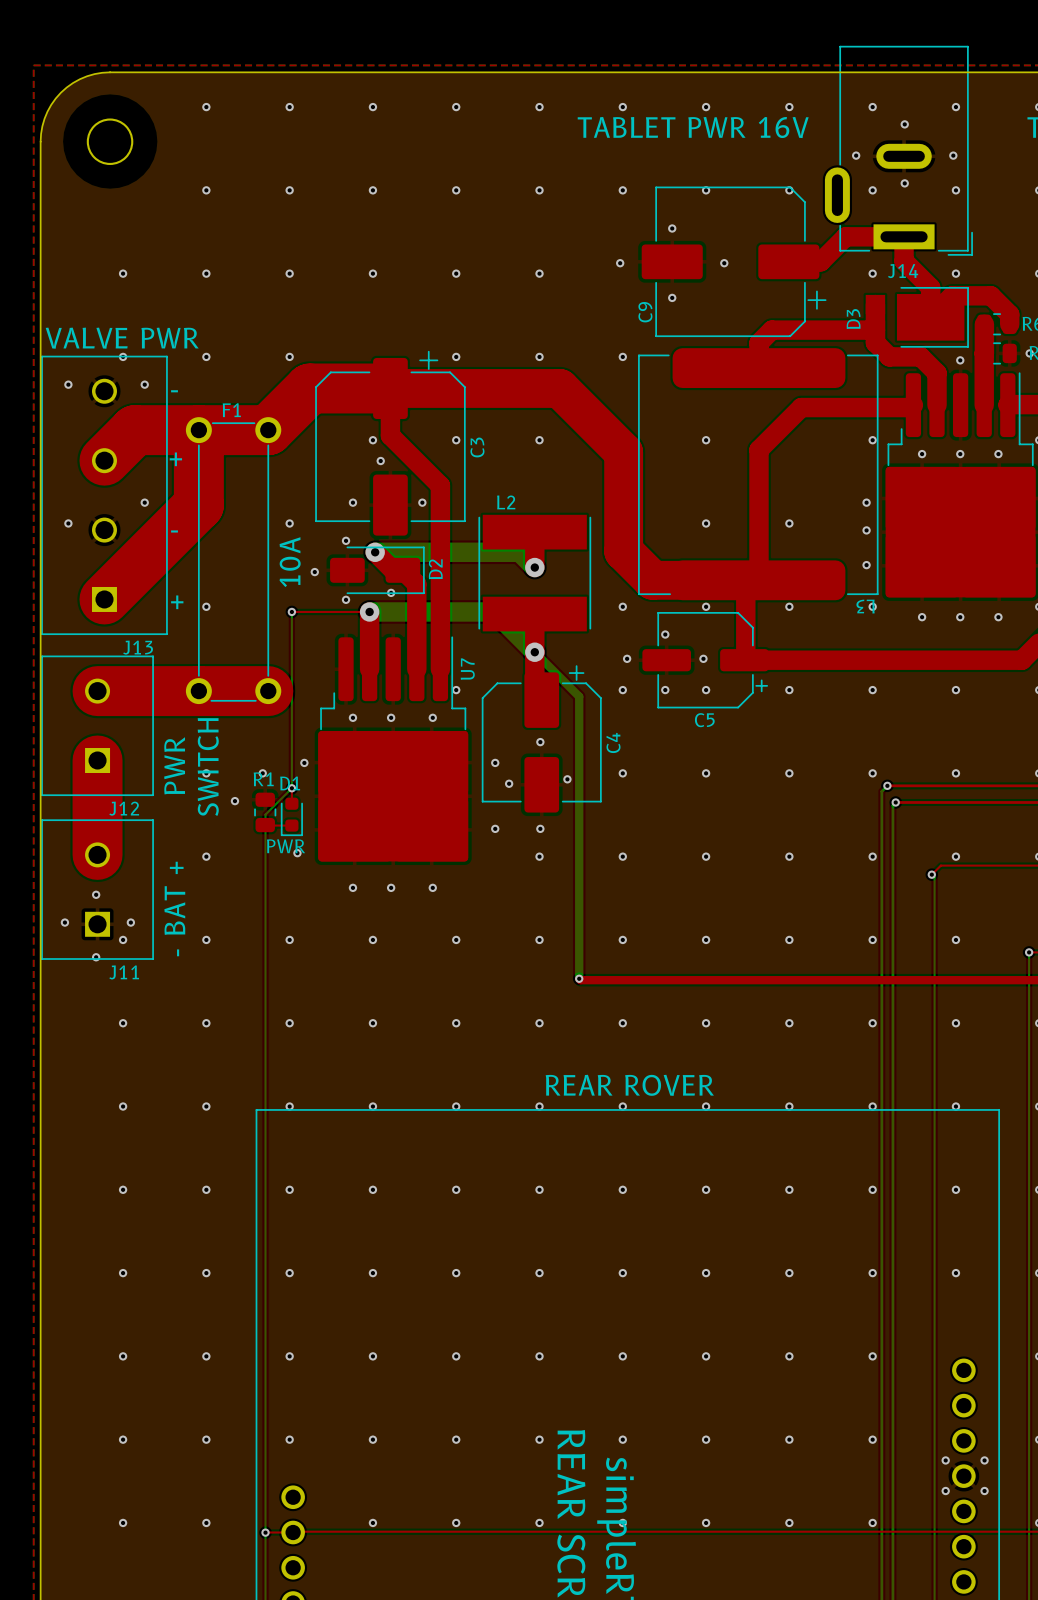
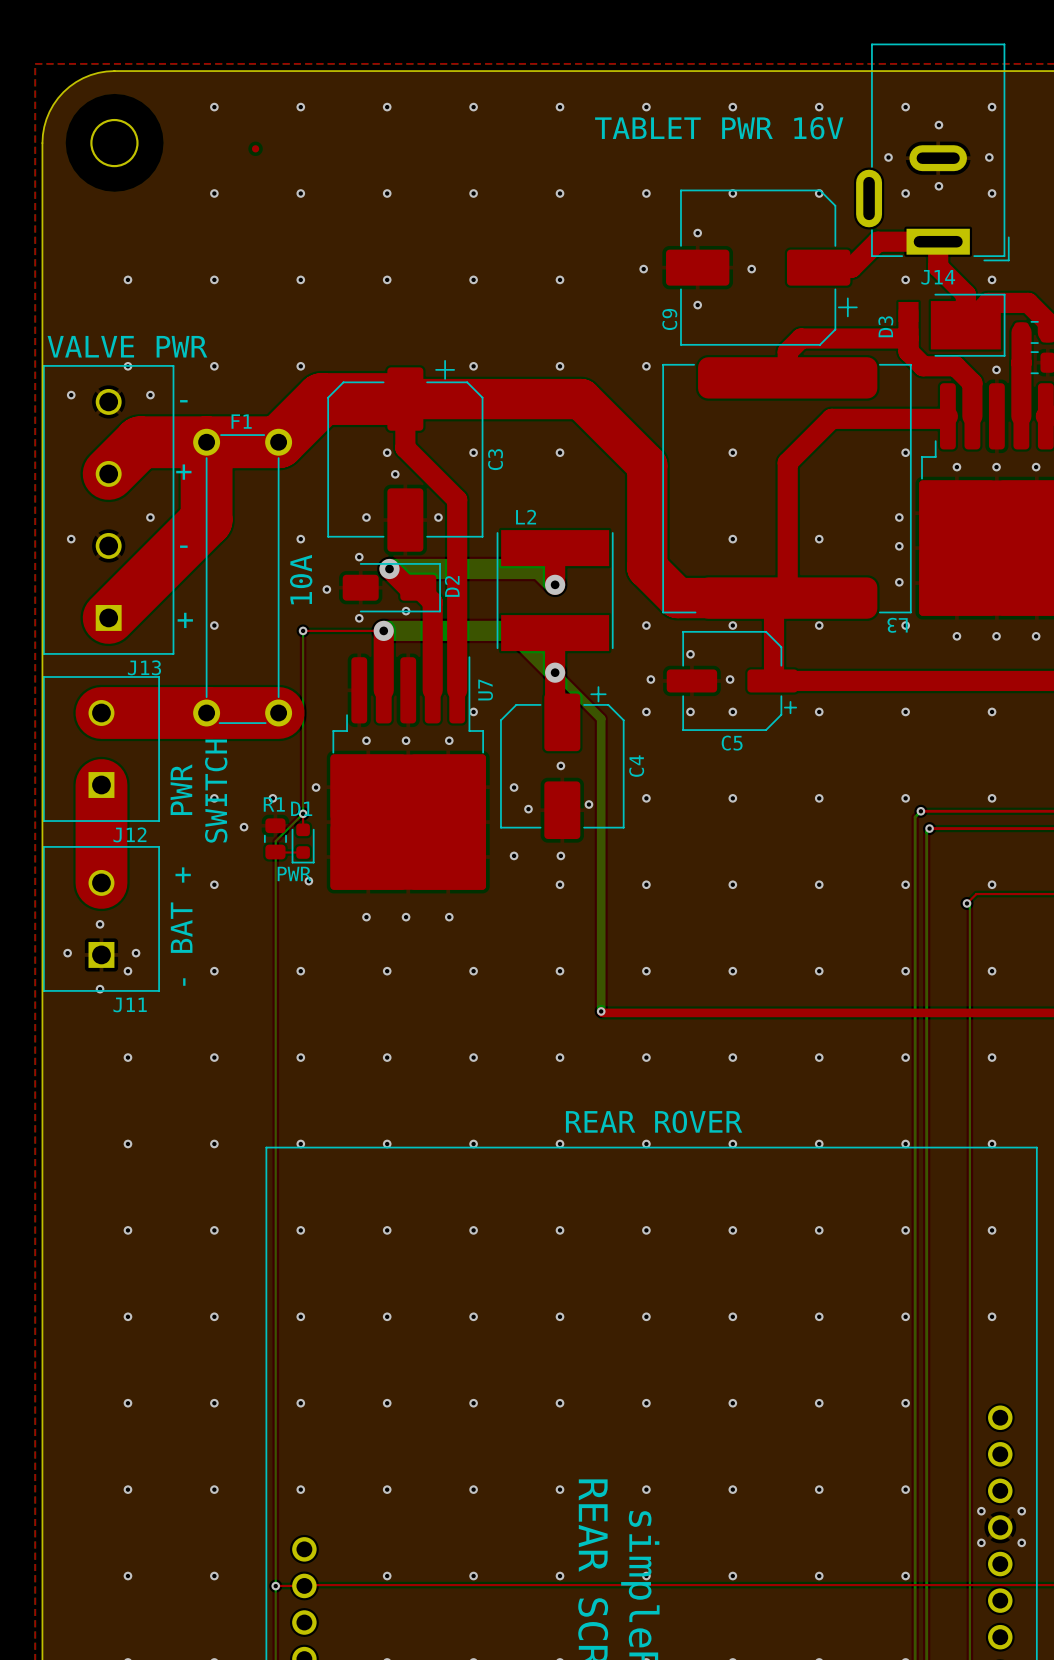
part: none -> (255, 148)

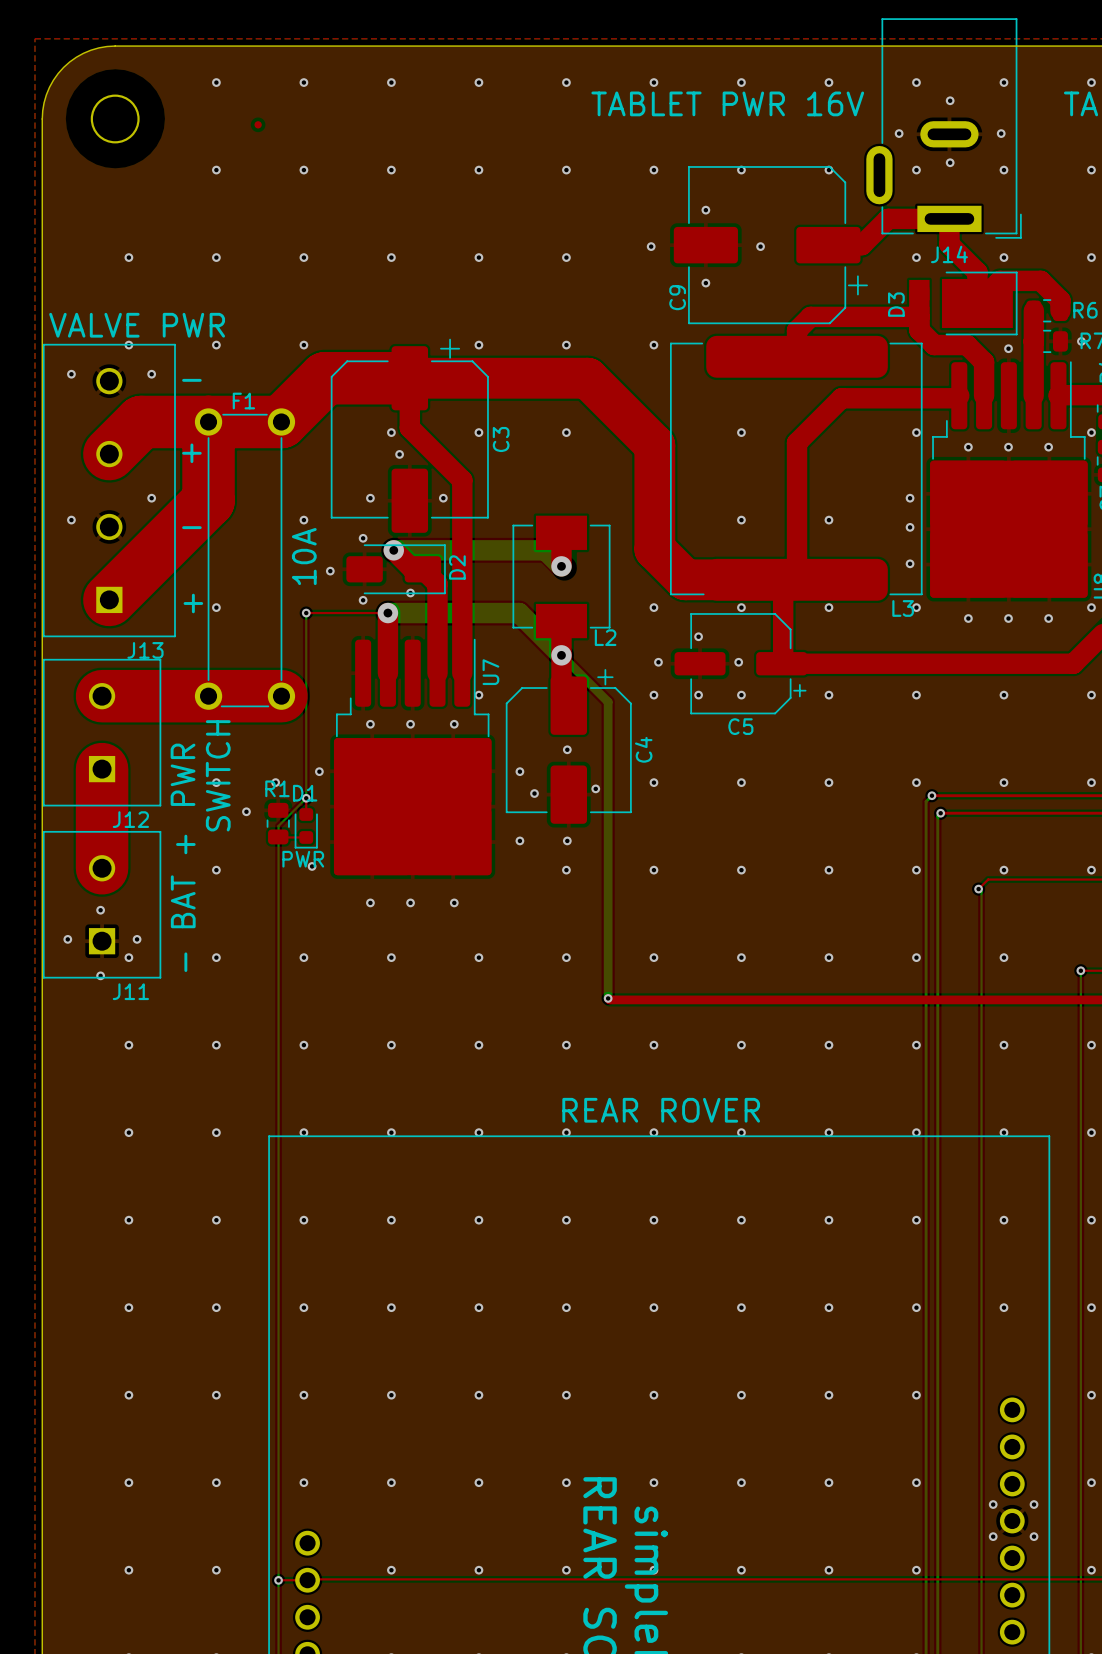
L2 name position: L2 (526, 517) -> L2 (605, 637)
L2 footprint: [496, 530, 614, 652] -> [512, 515, 611, 639]
L3 name rotation: 0° (897, 625) -> 180° (903, 608)

